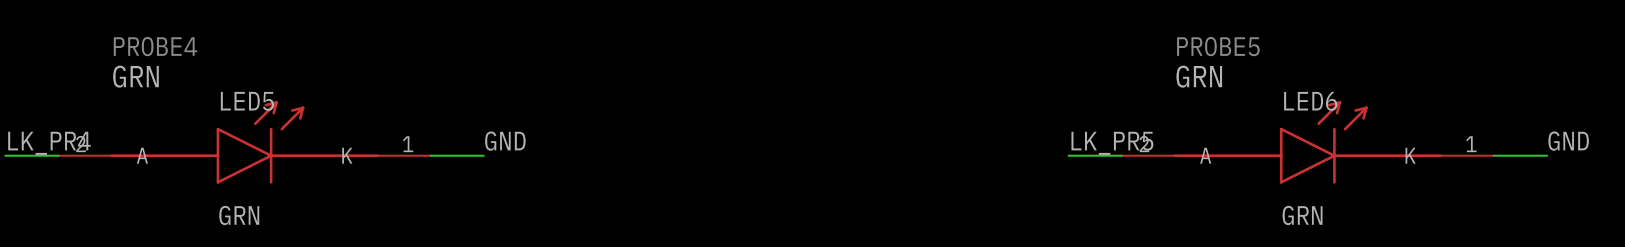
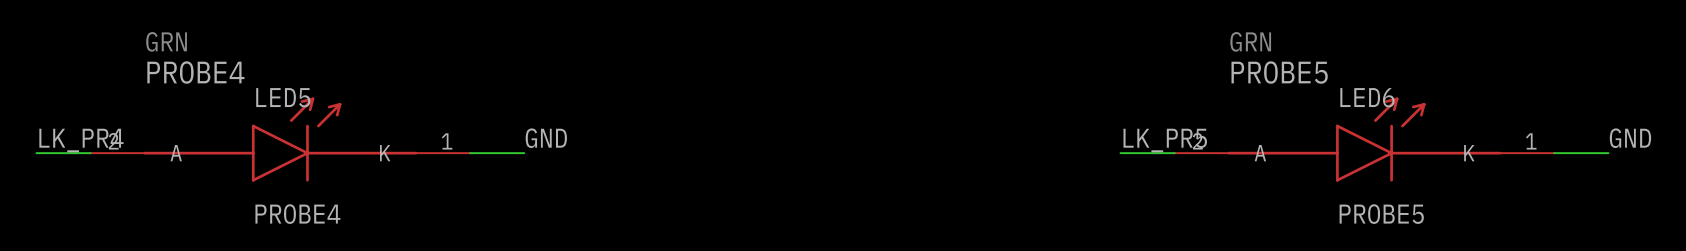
text: PROBE4 (155, 46) -> GRN (166, 41)
text: PROBE5 (1218, 46) -> GRN (1250, 41)
text: GRN (135, 76) -> PROBE4 (195, 72)
text: GRN (1199, 76) -> PROBE5 (1279, 72)
LED5 value: GRN (239, 215) -> PROBE4 (297, 214)
LED6 value: GRN (1302, 215) -> PROBE5 (1381, 214)

